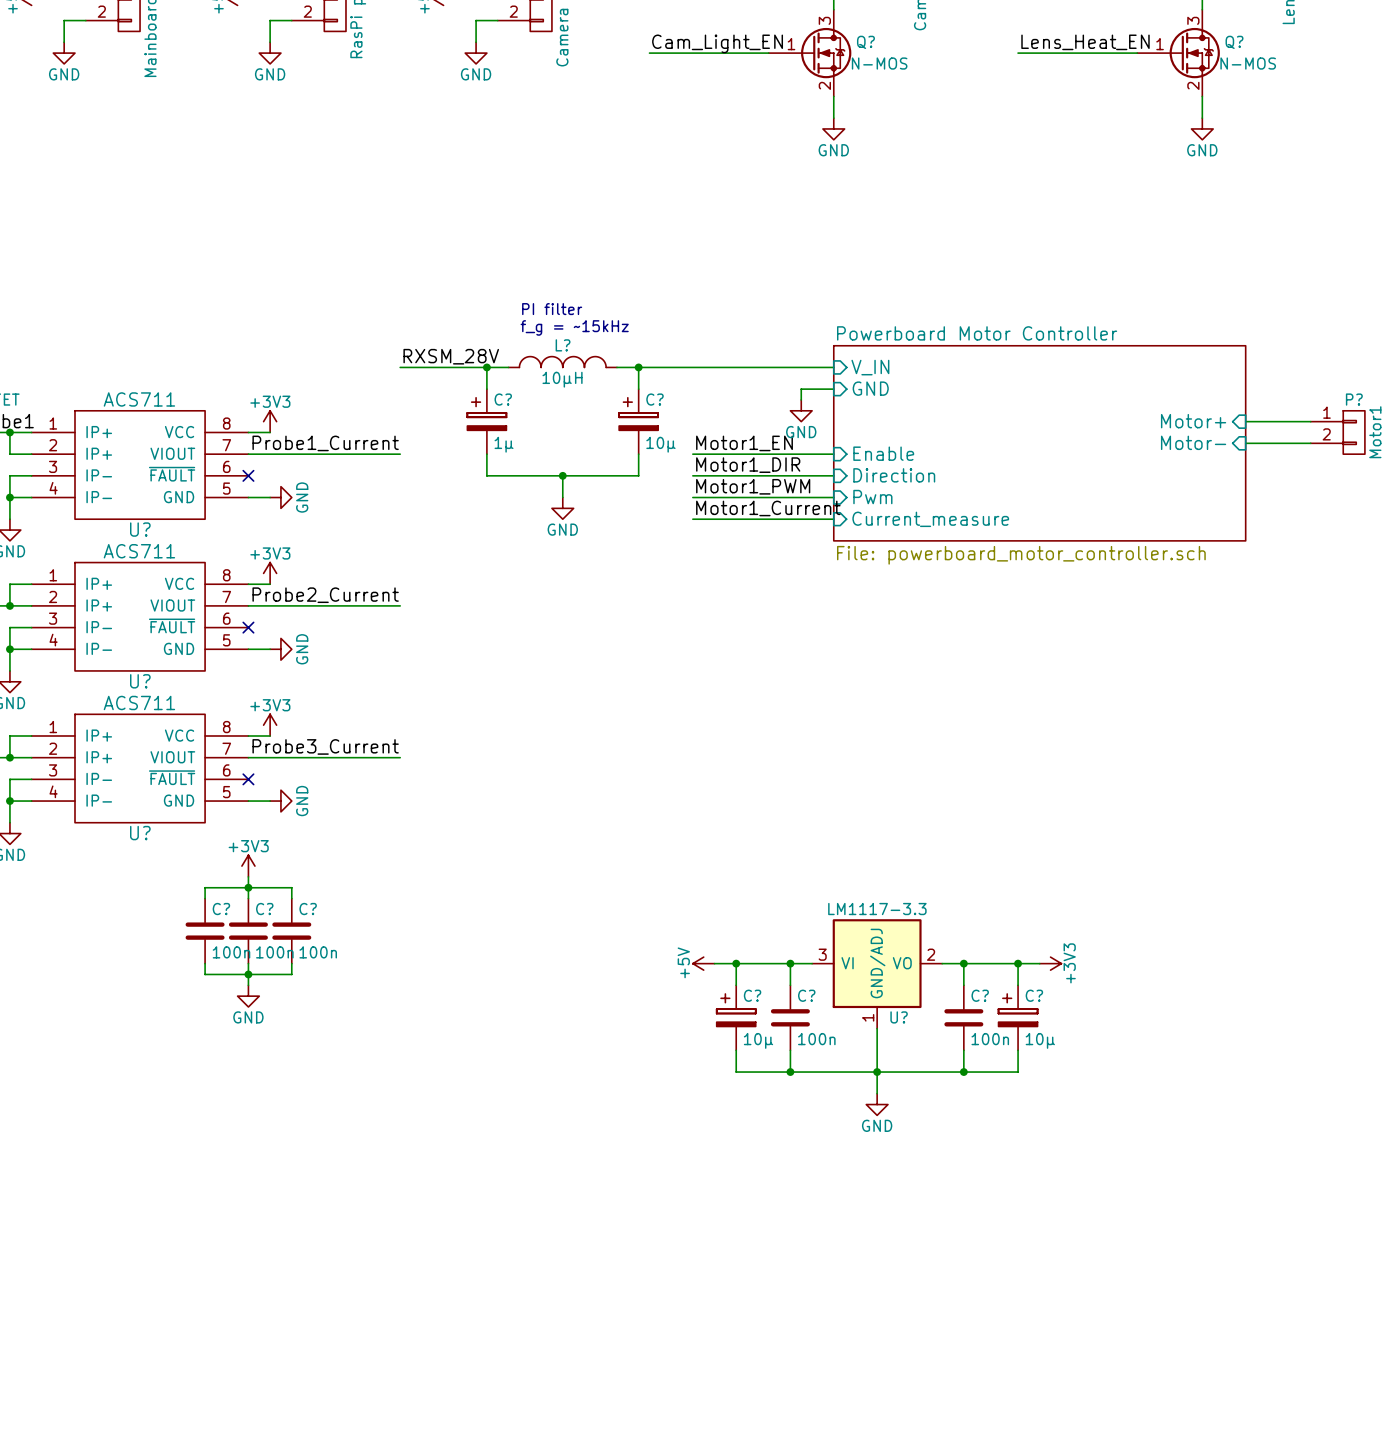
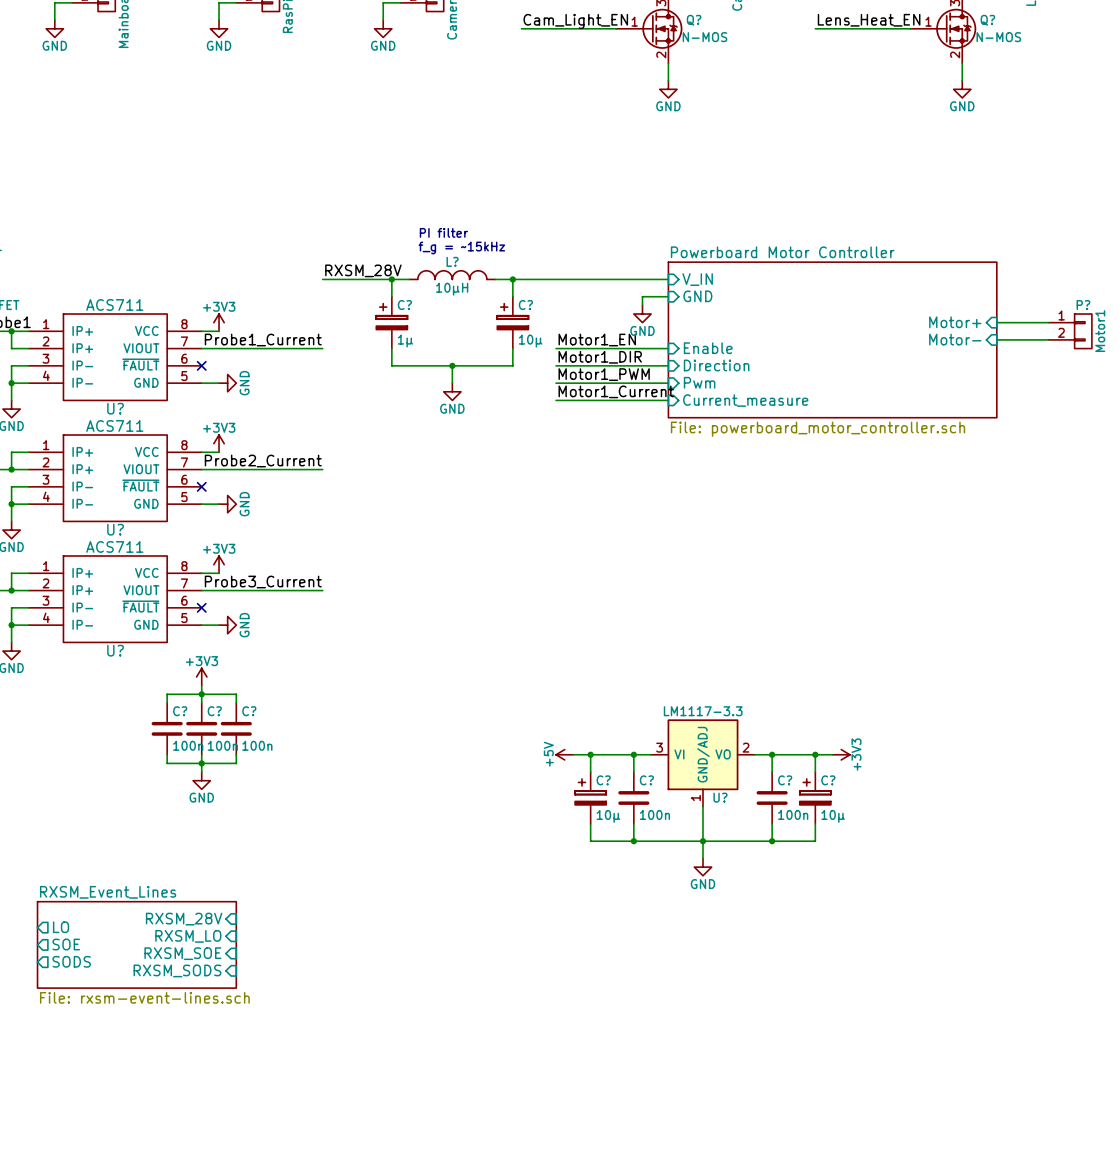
sheet pin: none -> RXSM_28V (184, 919)
sheet pin: none -> LO (61, 927)
sheet pin: none -> RXSM_LO (188, 936)
sheet pin: none -> SOE (66, 944)
sheet RXSM_Event_Lines: none -> File: rxsm-event-lines.sch (136, 944)
sheet pin: none -> RXSM_SOE (182, 953)
sheet pin: none -> SODS (71, 961)
sheet pin: none -> RXSM_SODS (177, 970)

